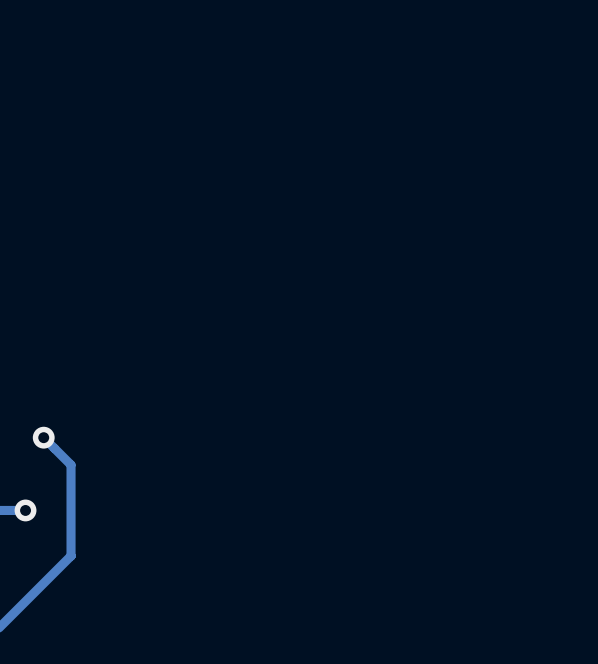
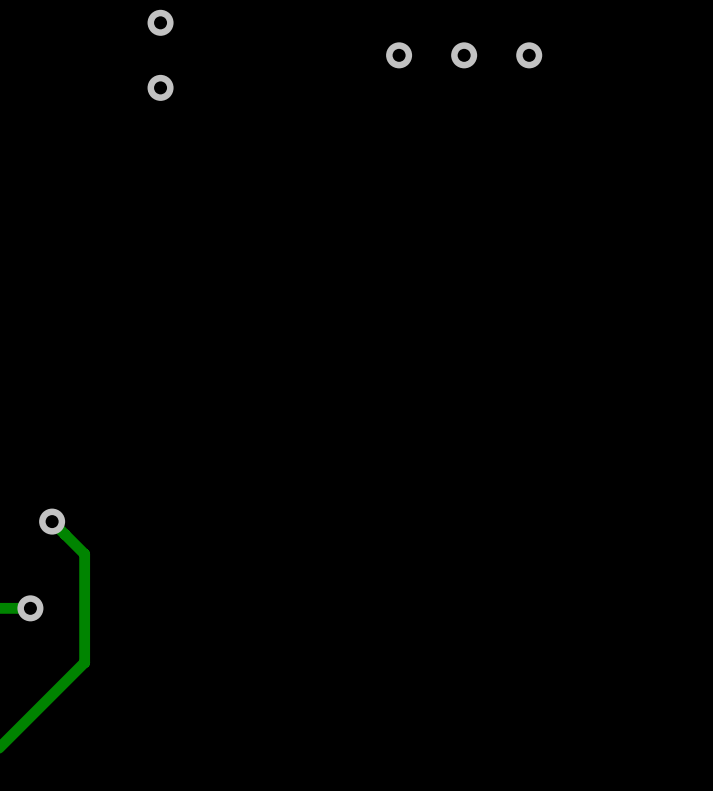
via: none -> (160, 22)
via: none -> (399, 55)
via: none -> (464, 55)
via: none -> (529, 55)
via: none -> (160, 87)

